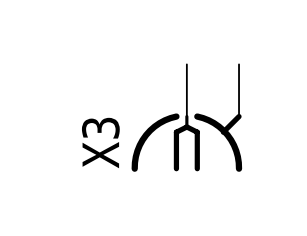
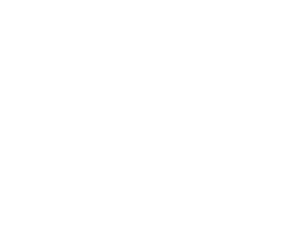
X3: (186, 118) -> none

